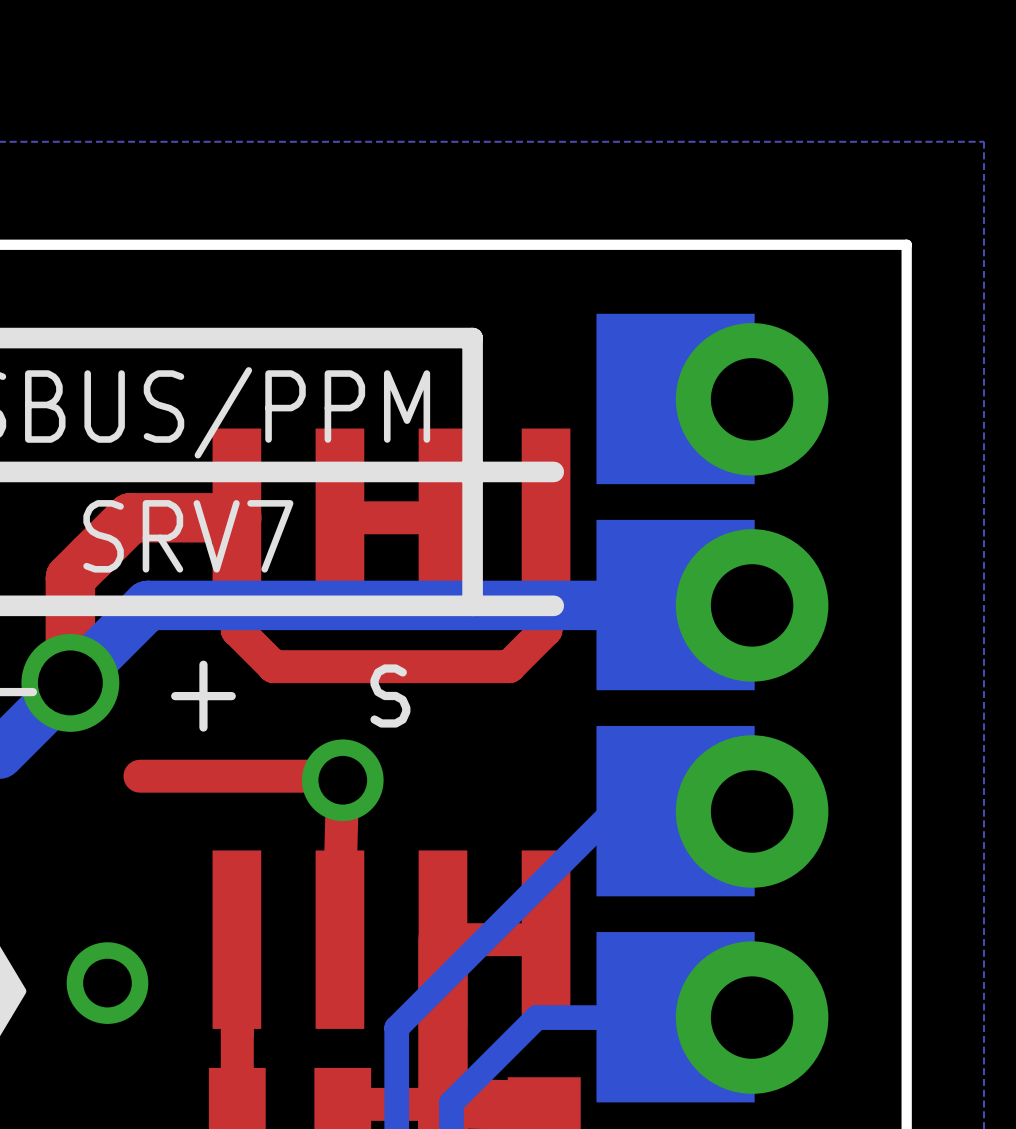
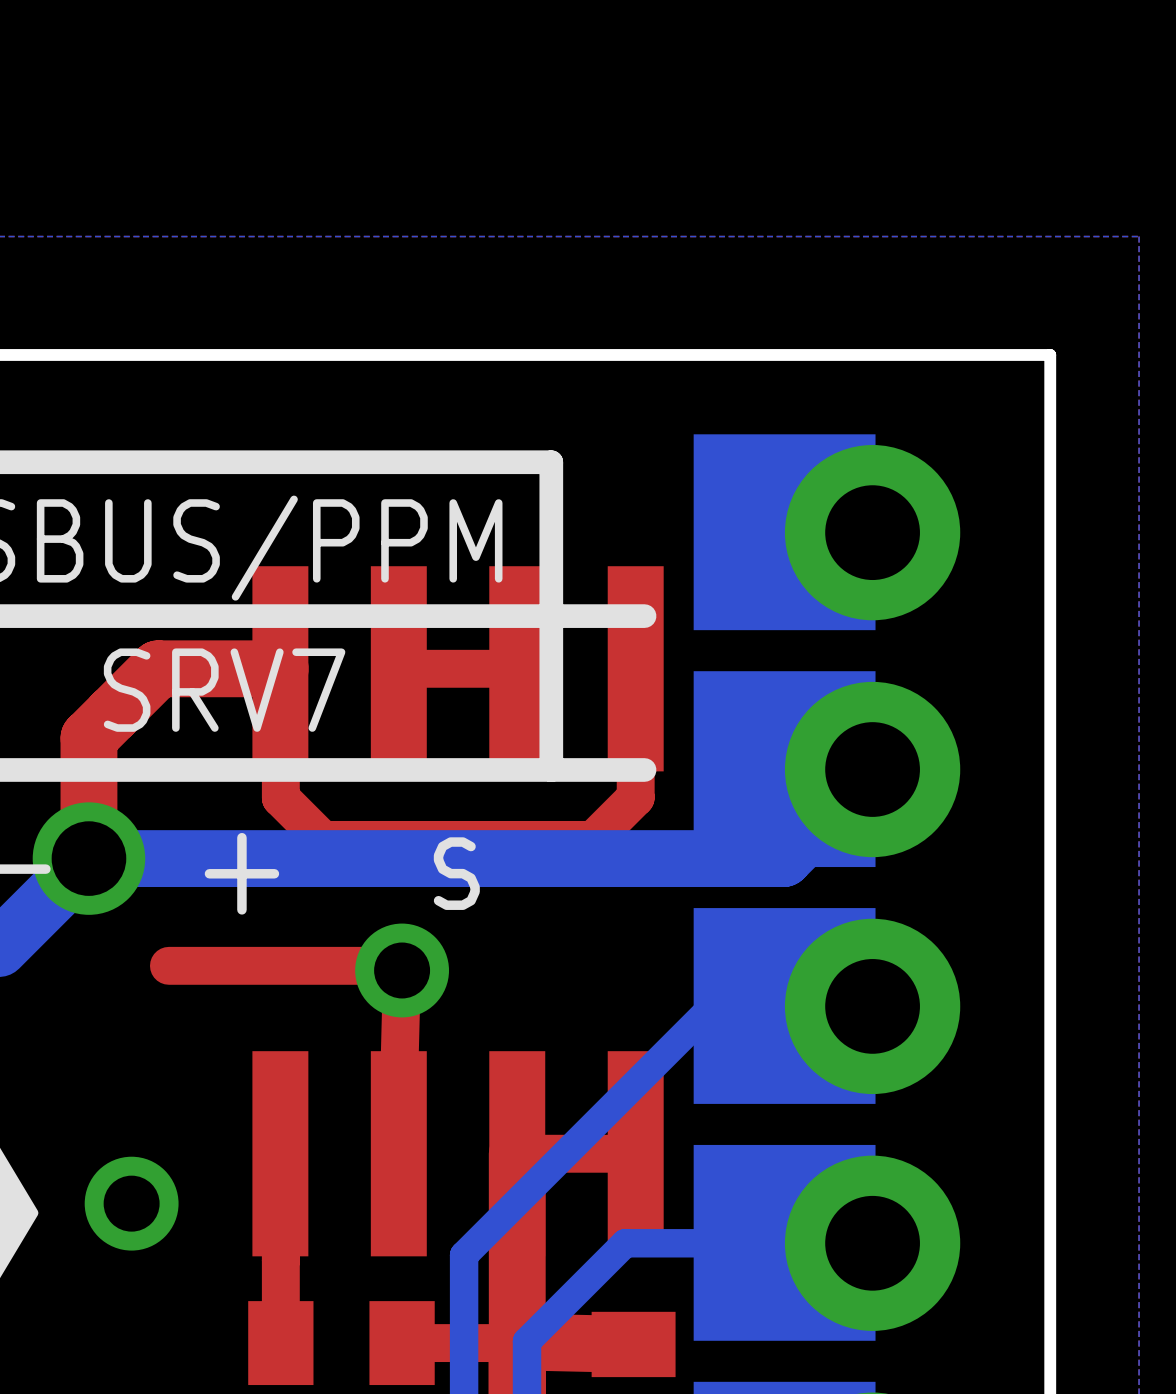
bottom track: (752, 605) (147, 605) (70, 682) -> (872, 769) (783, 858) (88, 858)

